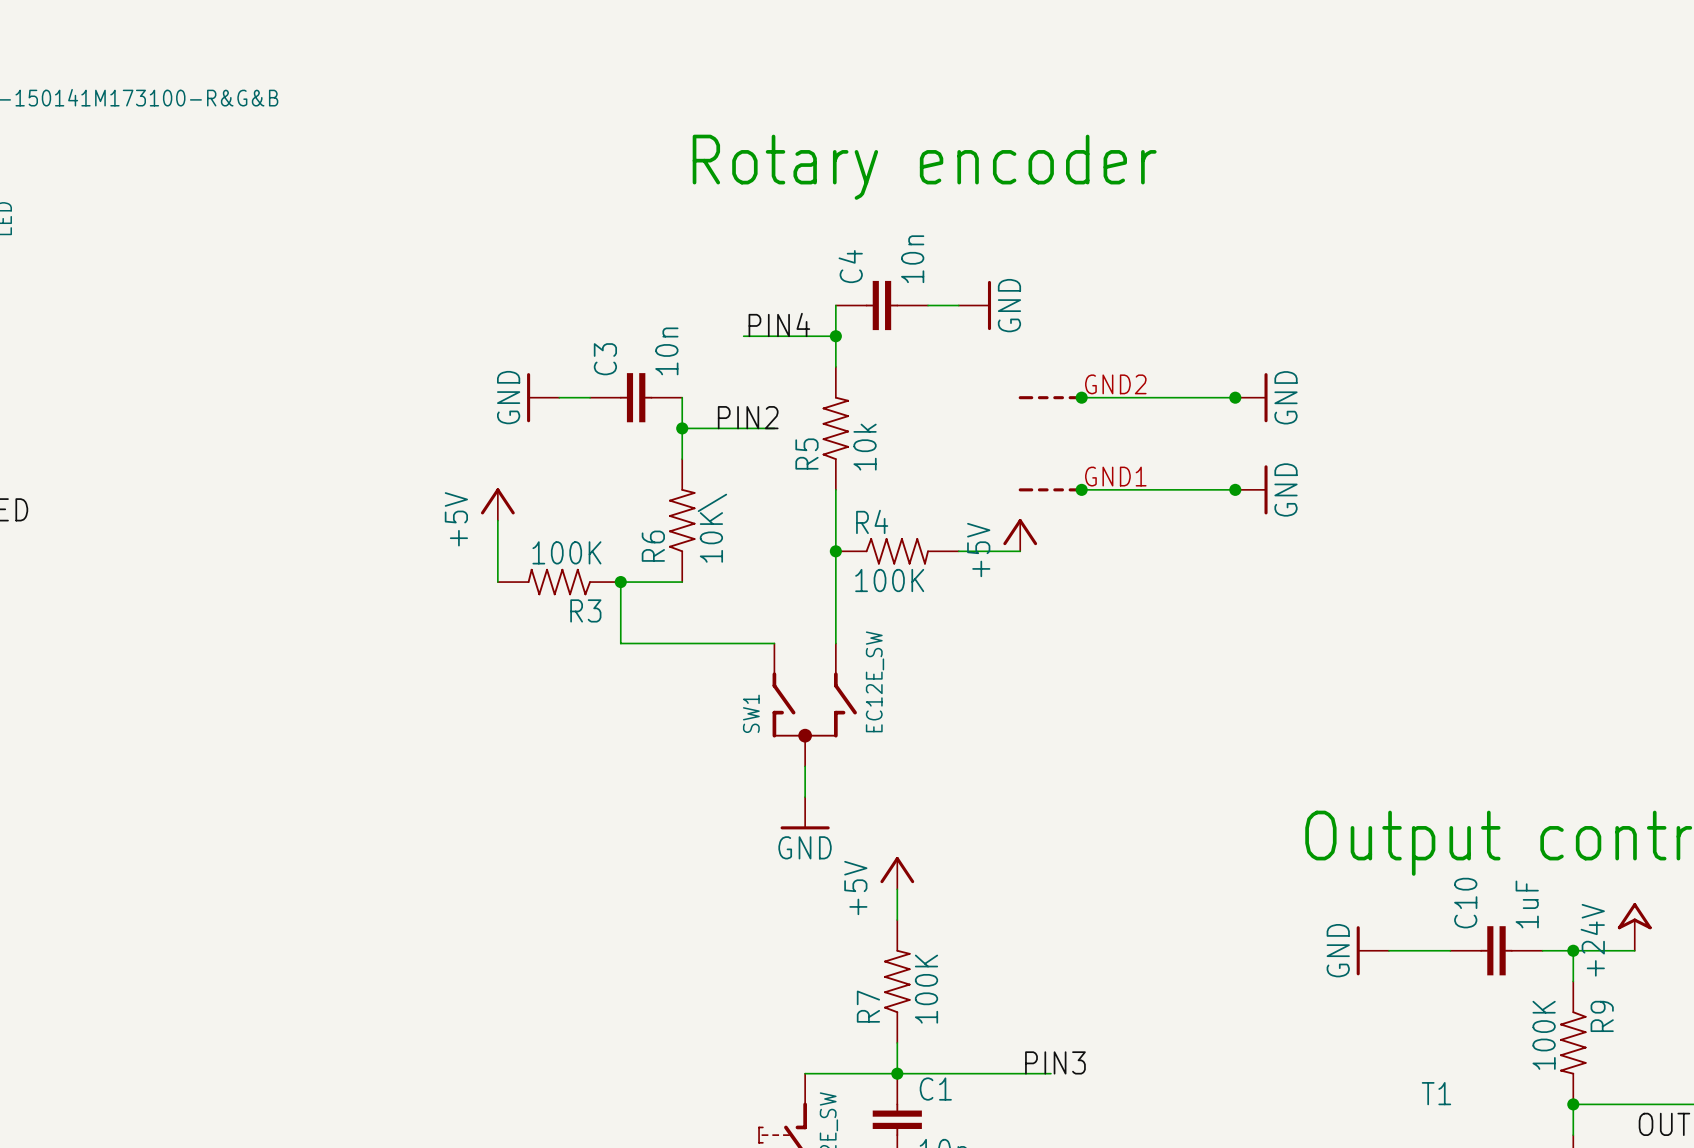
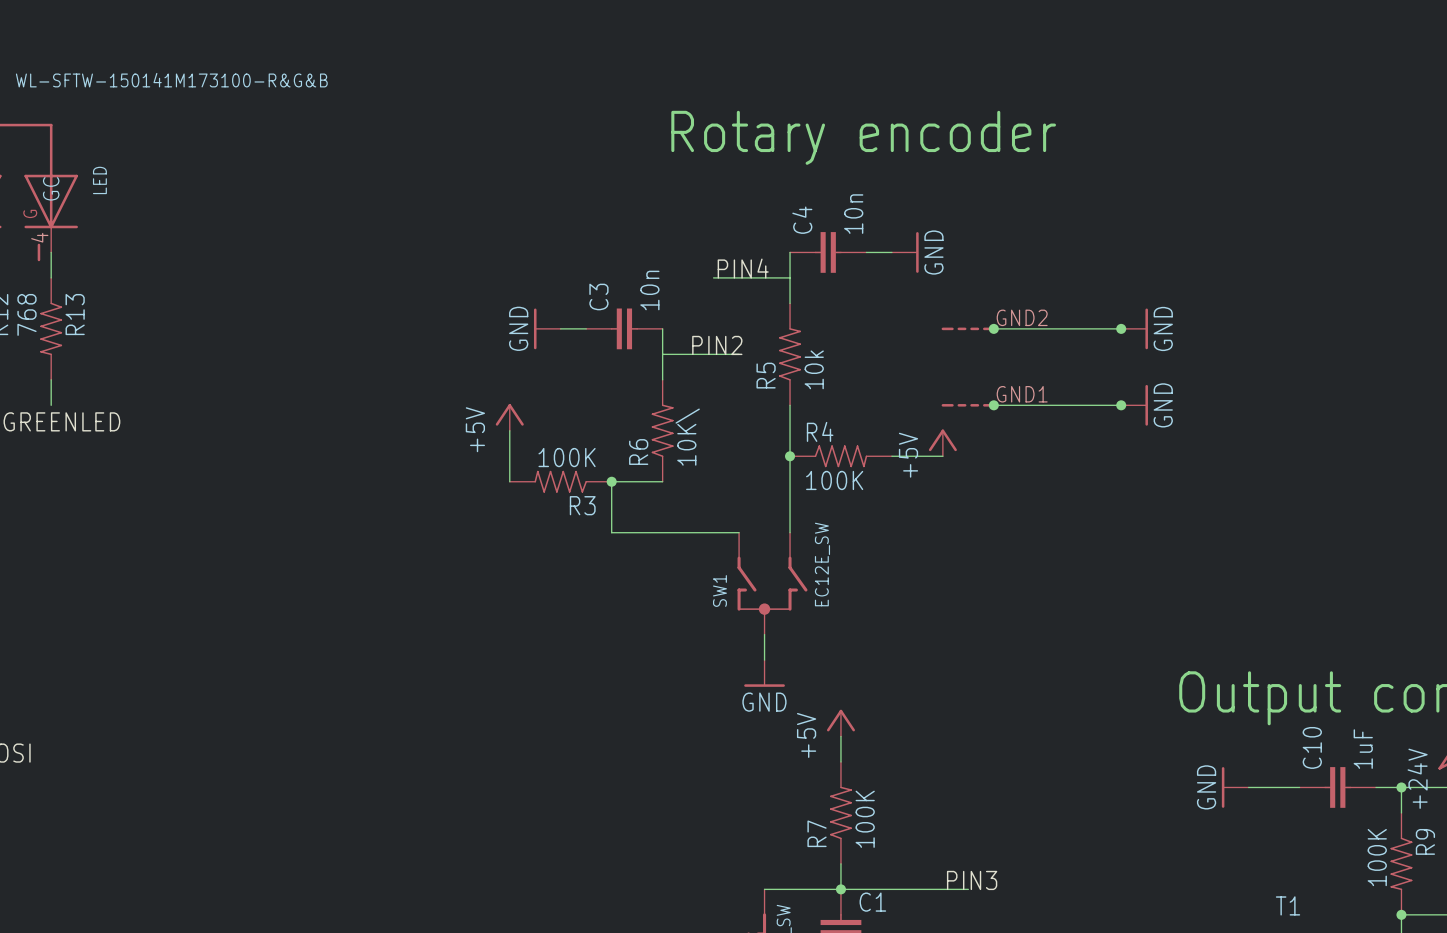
junction: (835, 336) -> none
junction: (682, 428) -> none

